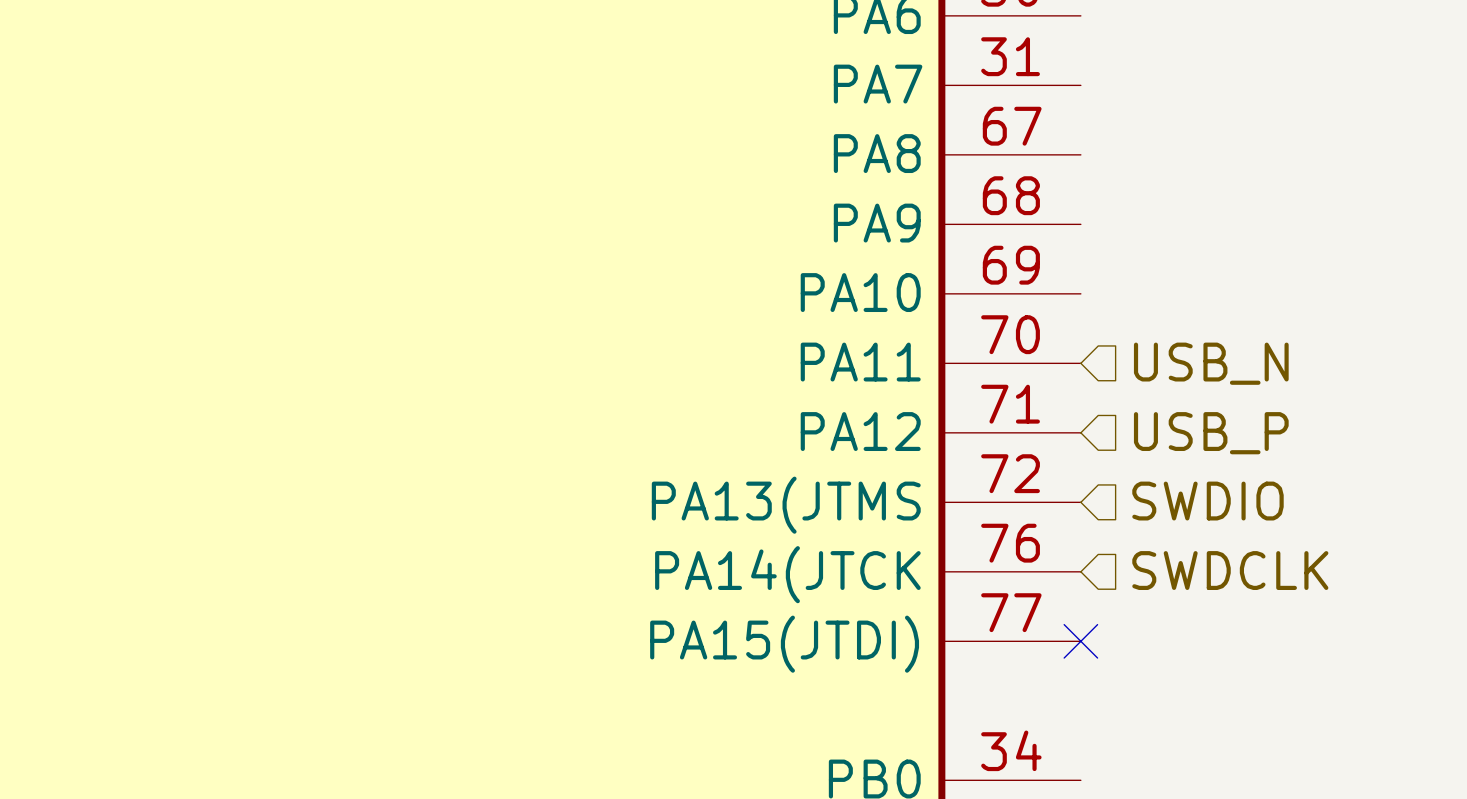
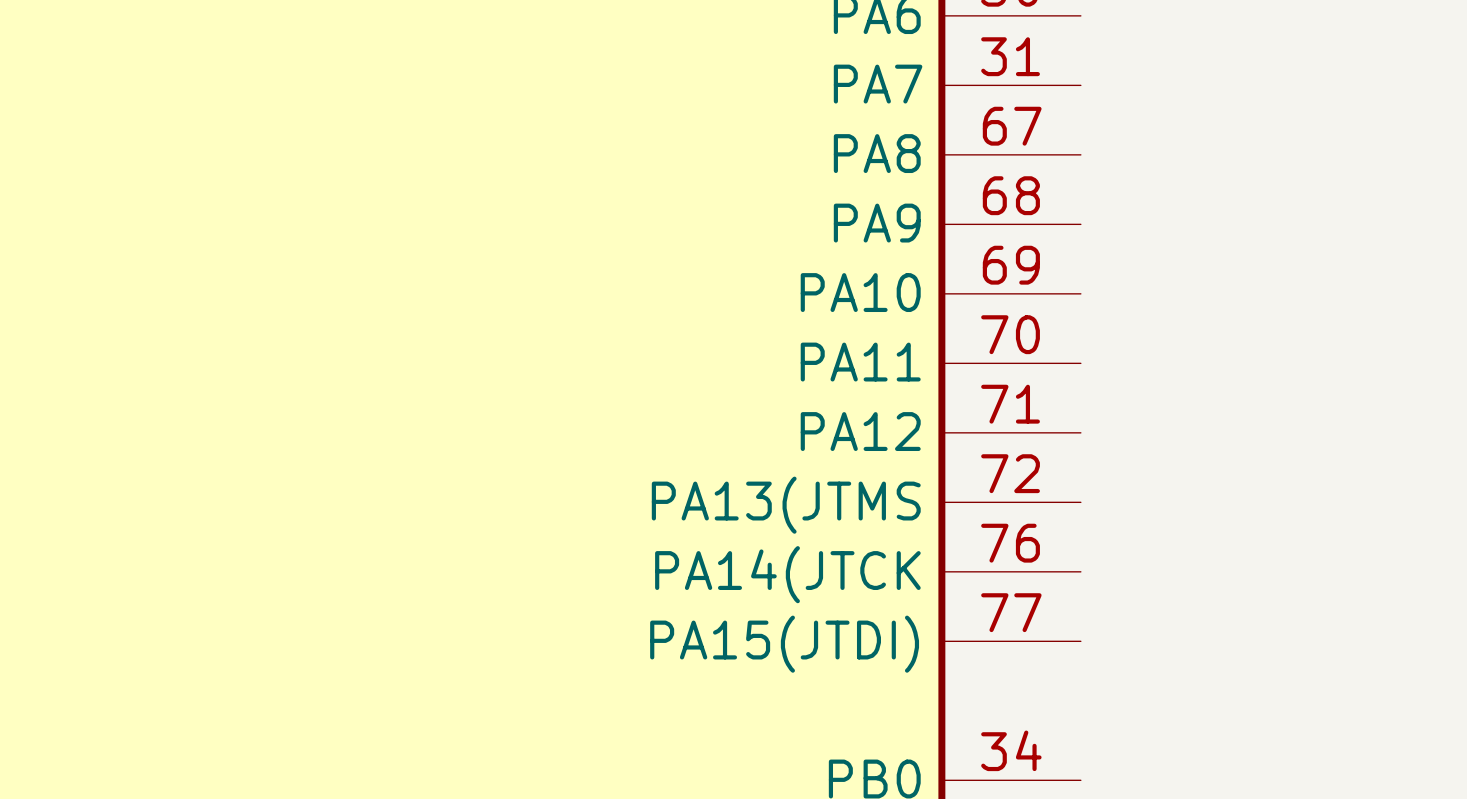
hierarchical label: USB_N (1211, 363) -> none
hierarchical label: USB_P (1211, 433) -> none
hierarchical label: SWDIO (1207, 501) -> none
hierarchical label: SWDCLK (1230, 570) -> none
no-connect mark: (1080, 641) -> none

